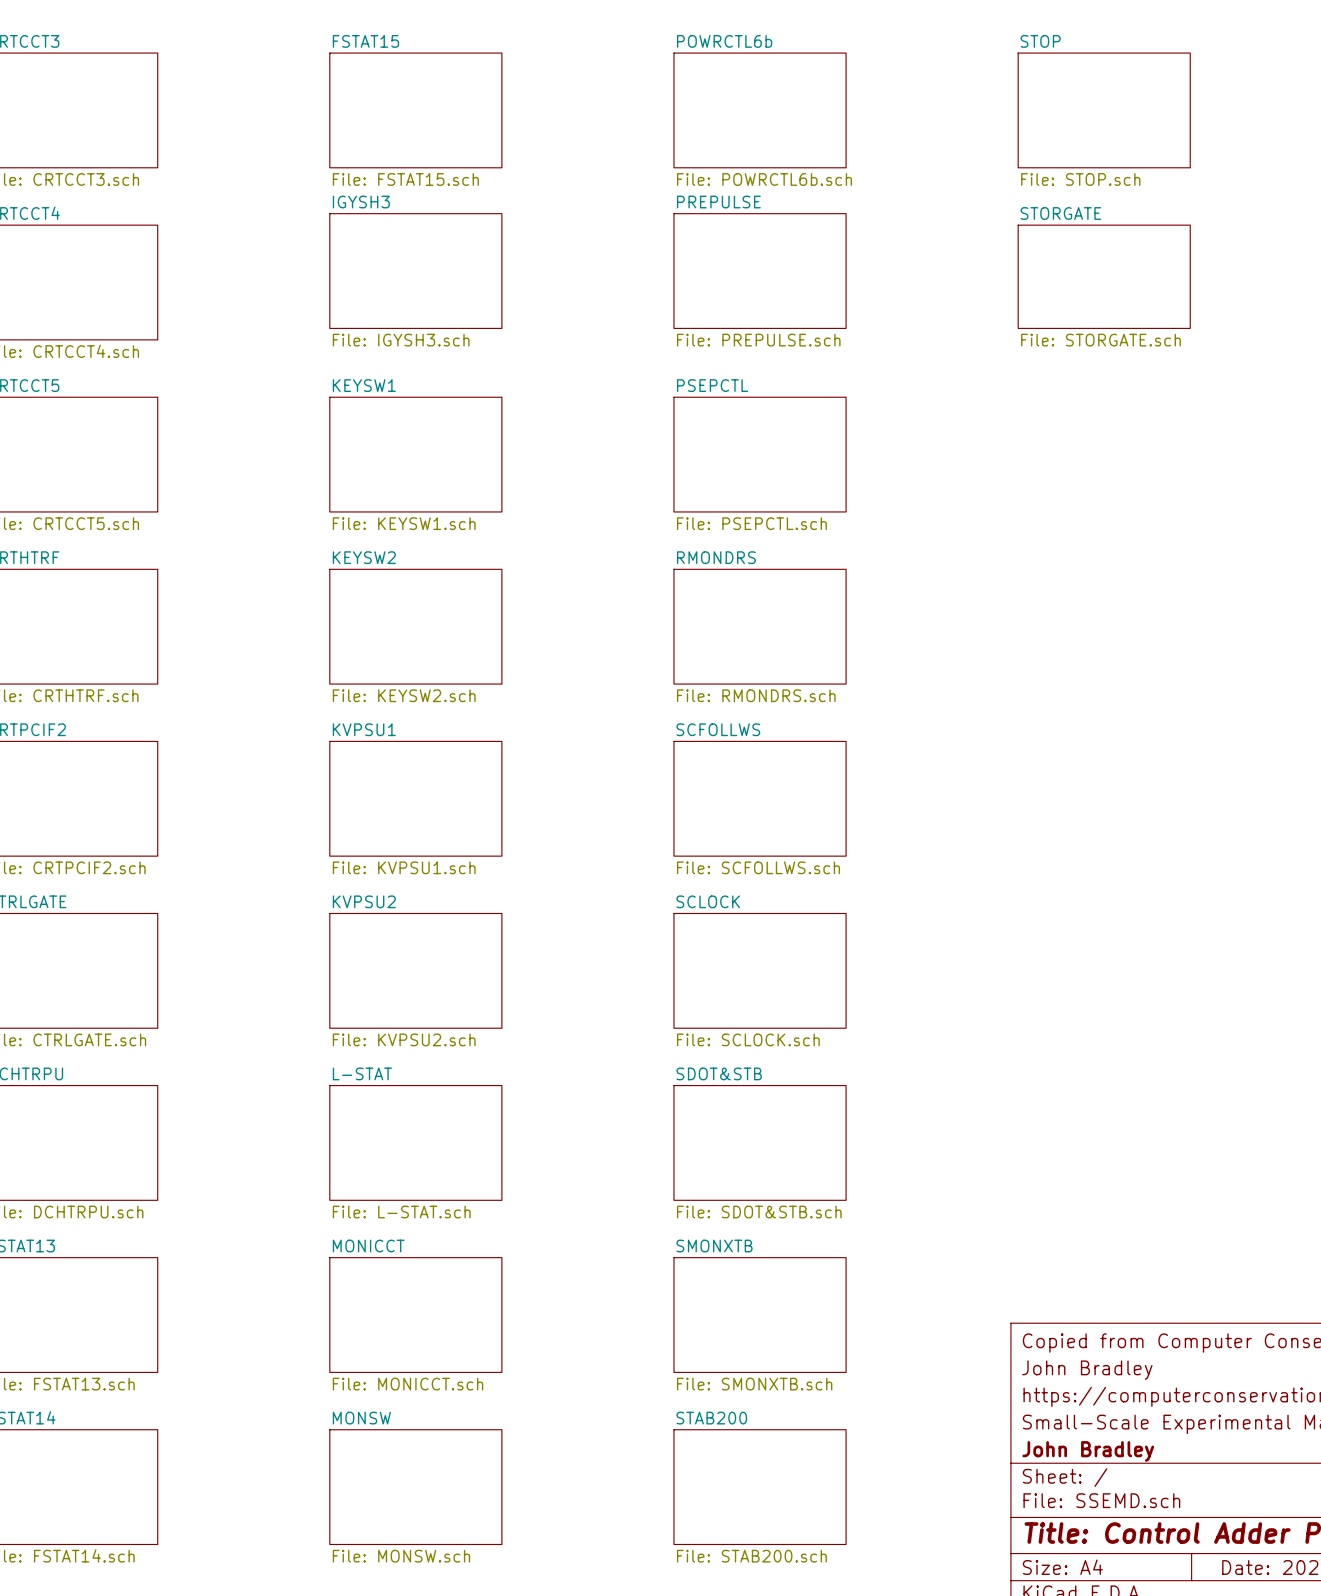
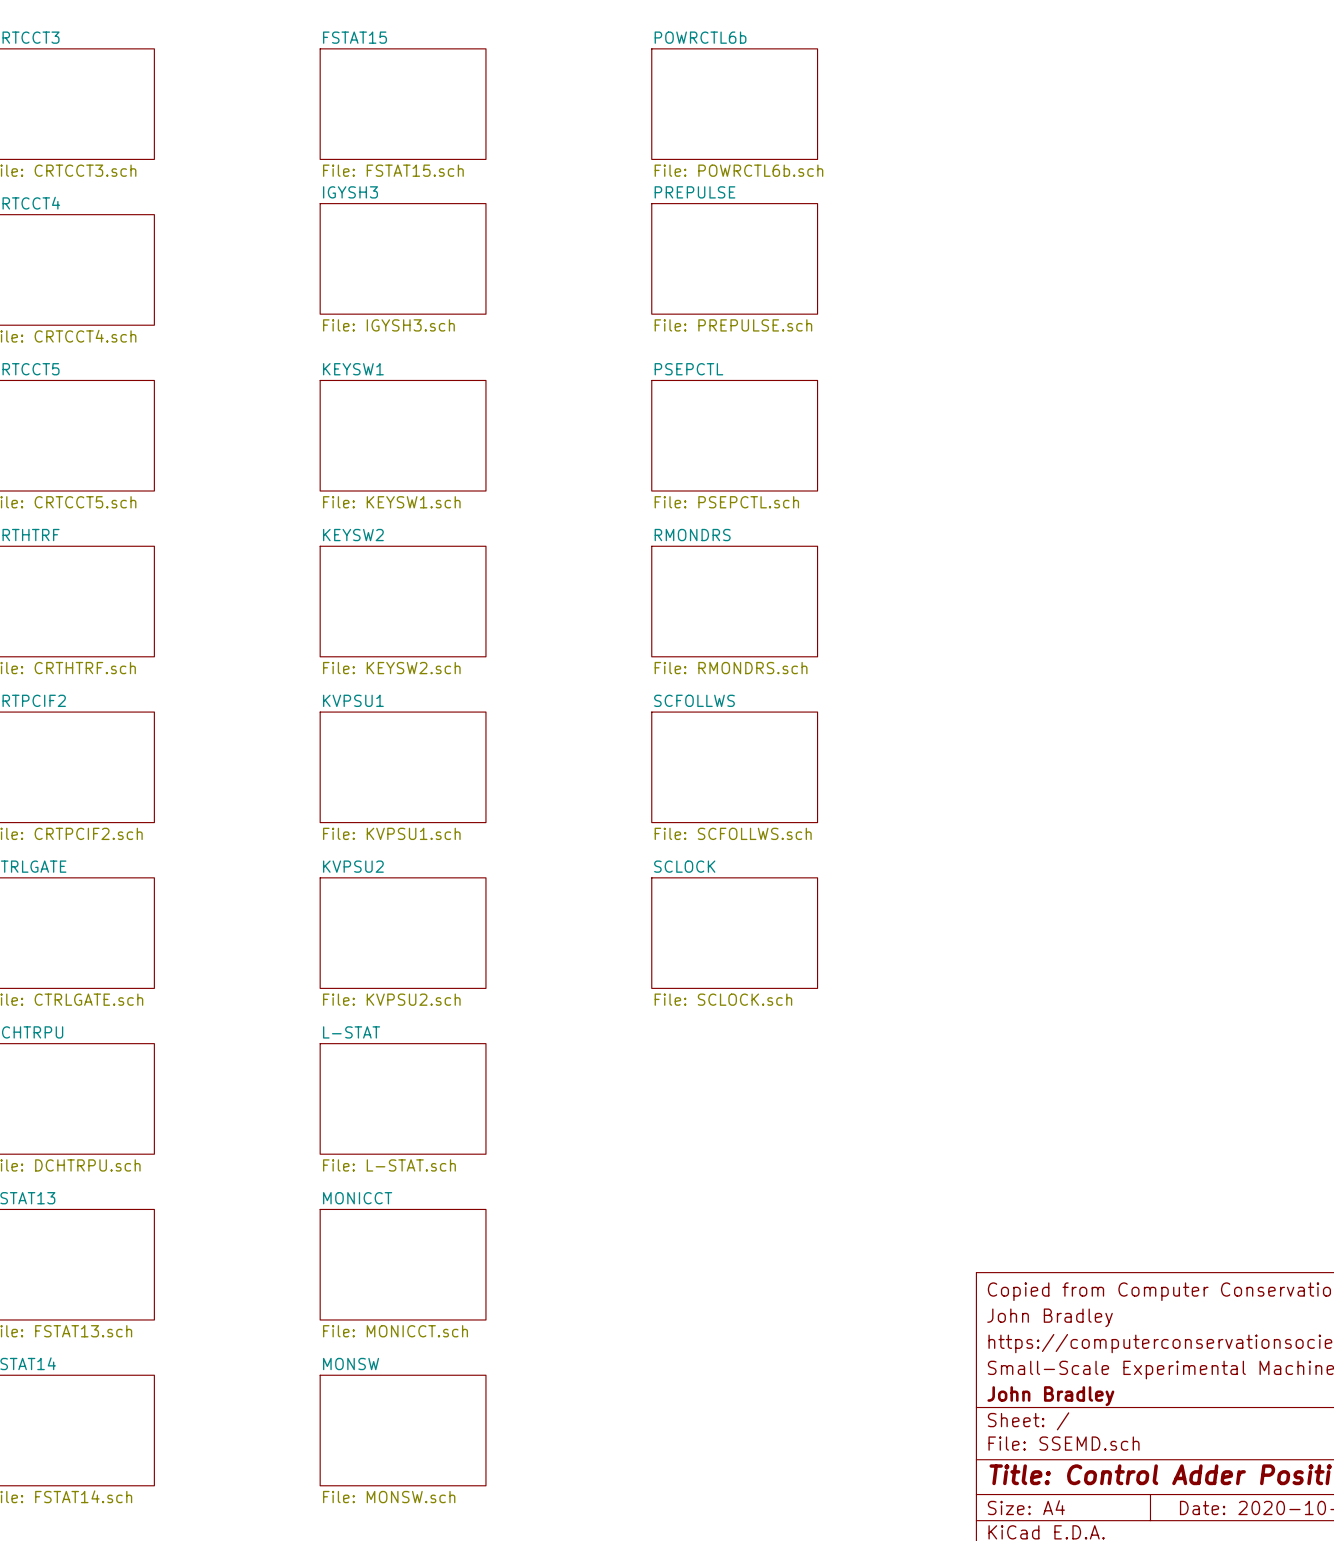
sheet STOP: File: STOP.sch (1104, 110) -> none
sheet STORGATE: File: STORGATE.sch (1104, 276) -> none
sheet SDOT&STB: File: SDOT&STB.sch (760, 1142) -> none
sheet SMONXTB: File: SMONXTB.sch (760, 1315) -> none
sheet STAB200: File: STAB200.sch (760, 1487) -> none

